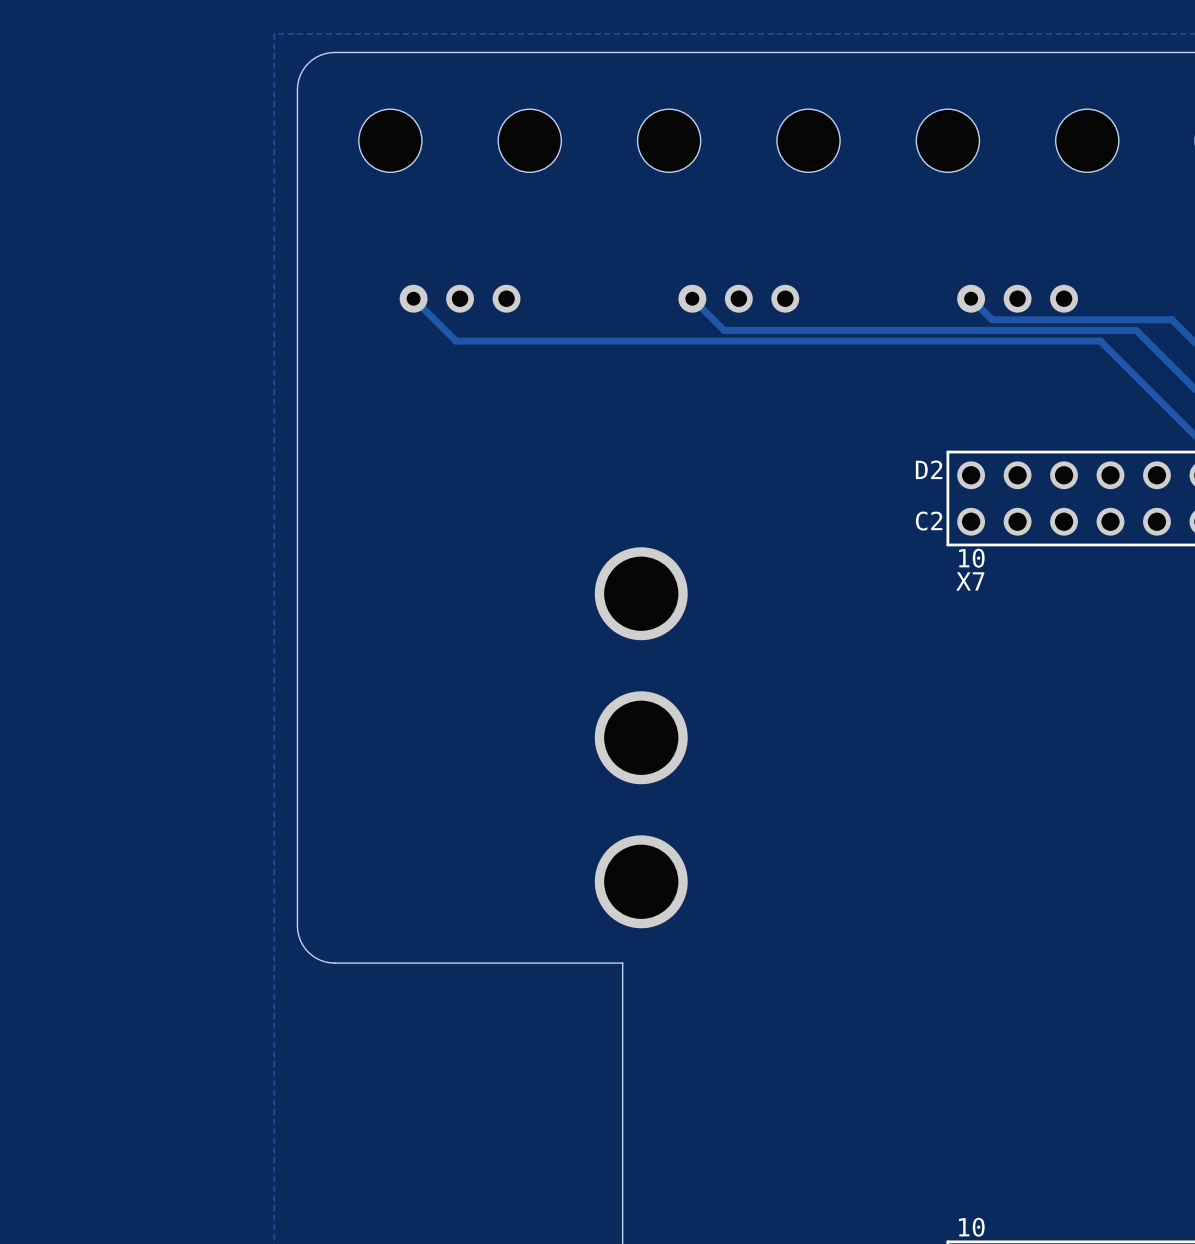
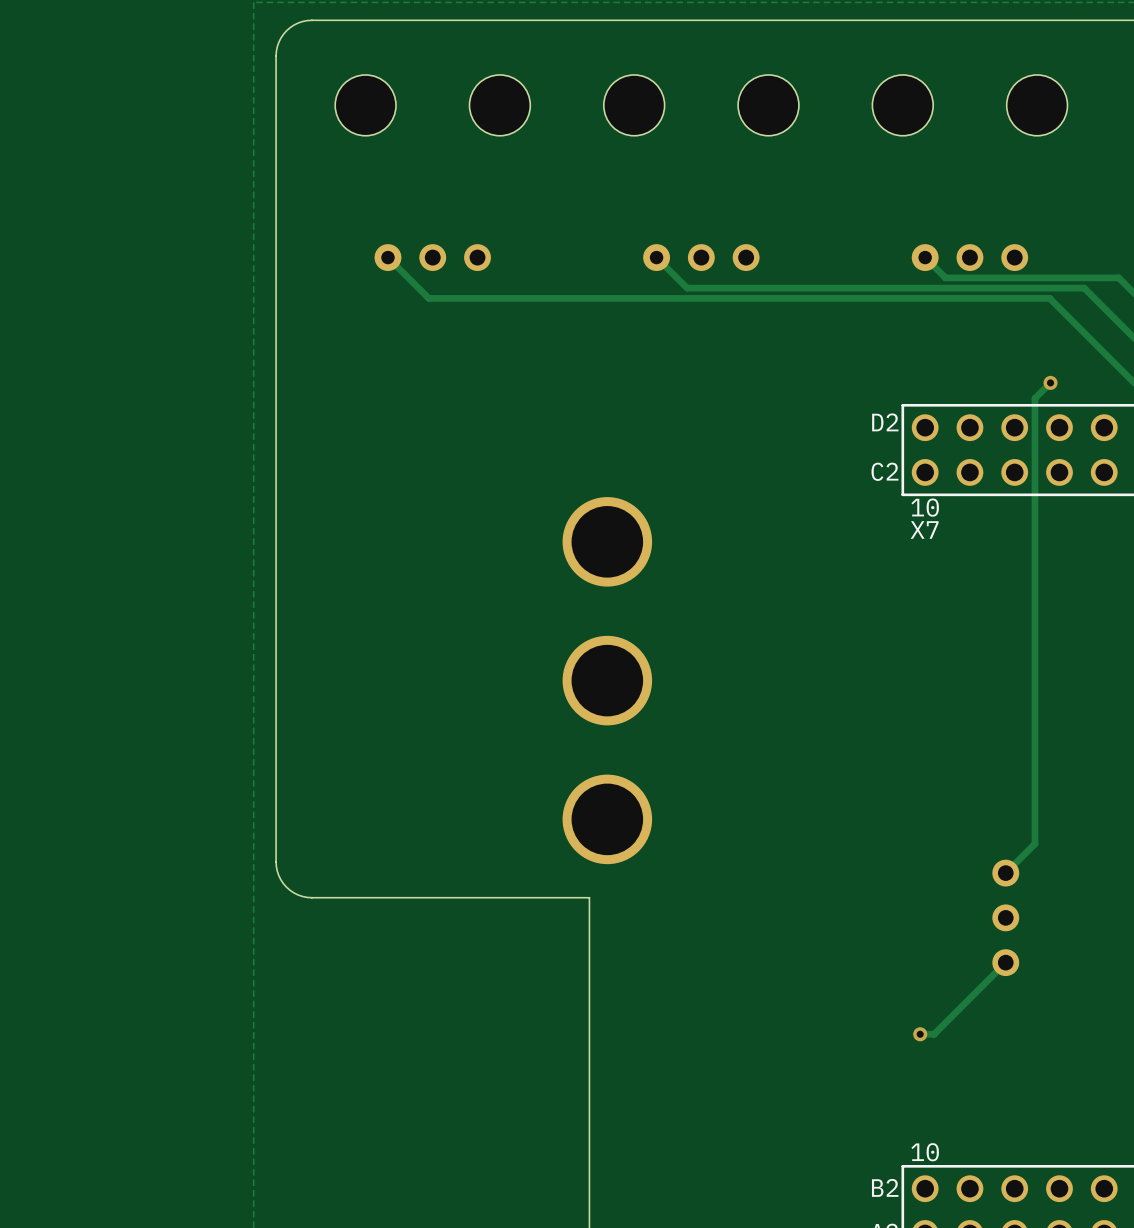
track: none -> (1050, 382) (1034, 398) (1034, 843) (1005, 873)
via: none -> (1050, 382)
part: none -> (1005, 917)
track: none -> (1005, 962) (934, 1034) (920, 1034)
via: none -> (920, 1034)

